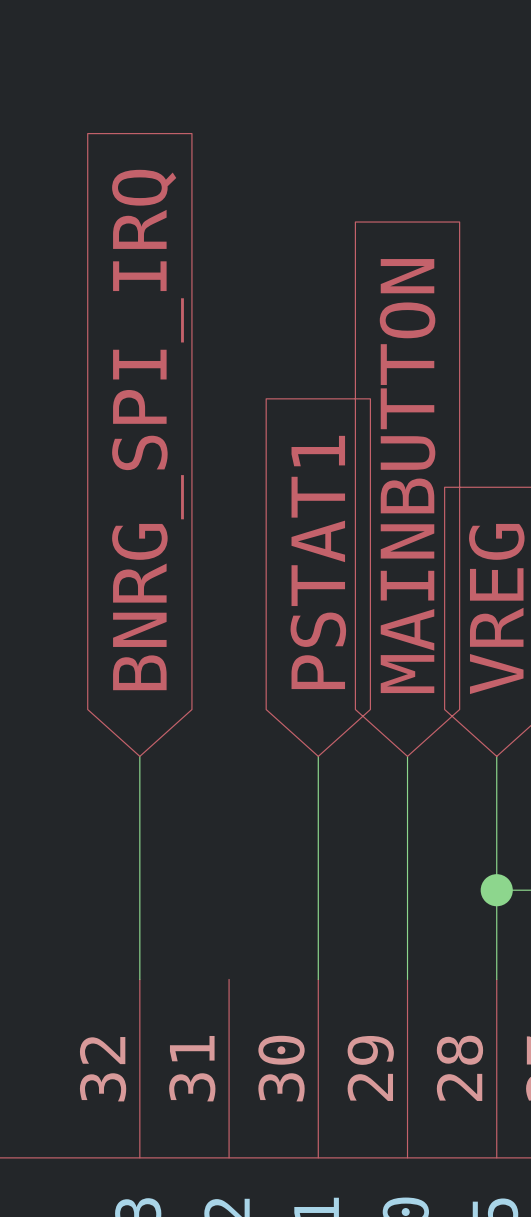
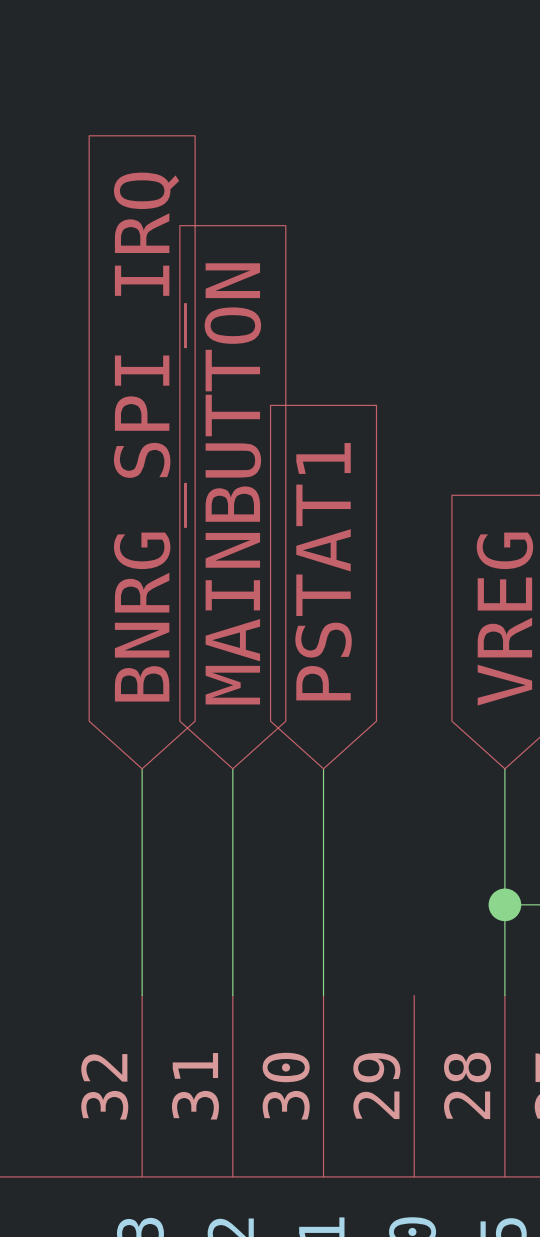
global label position: MAINBUTTON (407, 476) -> MAINBUTTON (232, 483)
wire: (407, 756) (407, 979) -> (232, 768) (232, 995)

